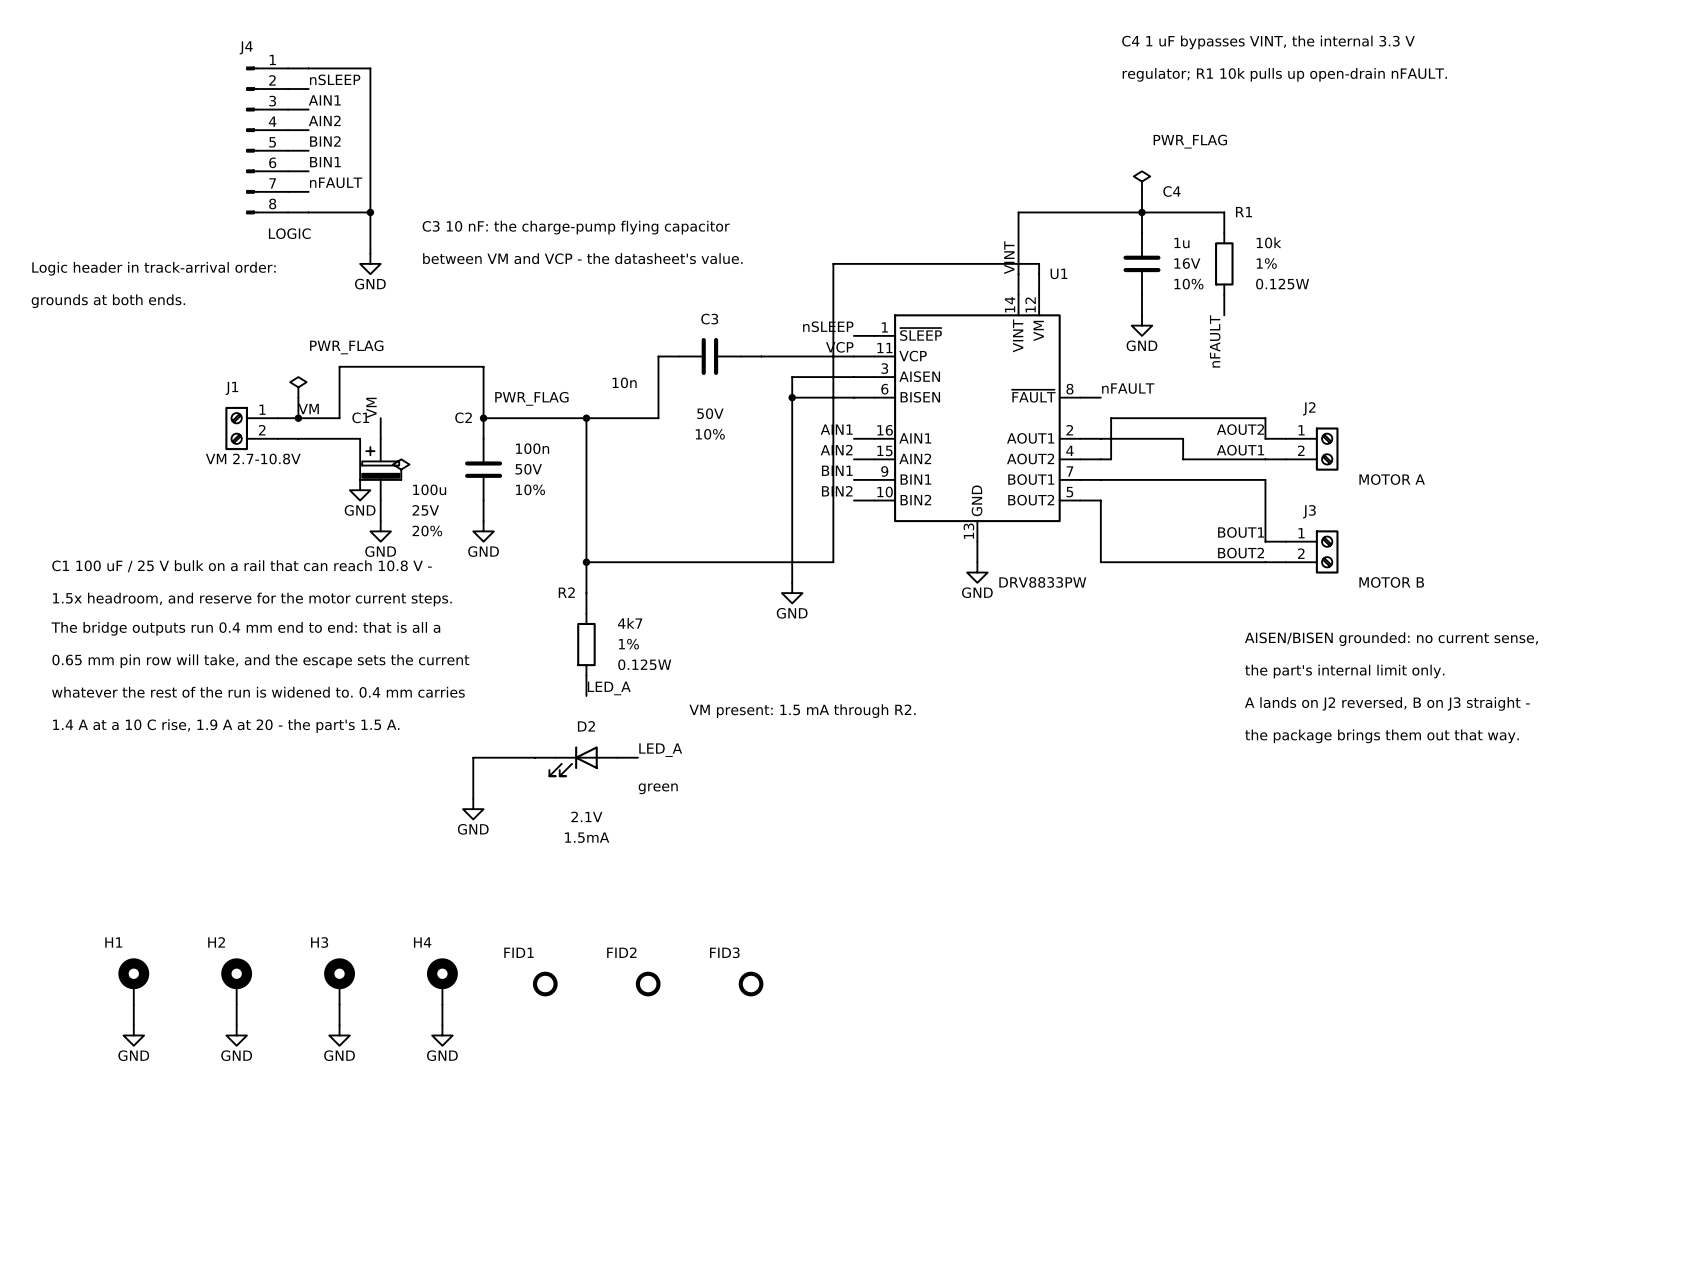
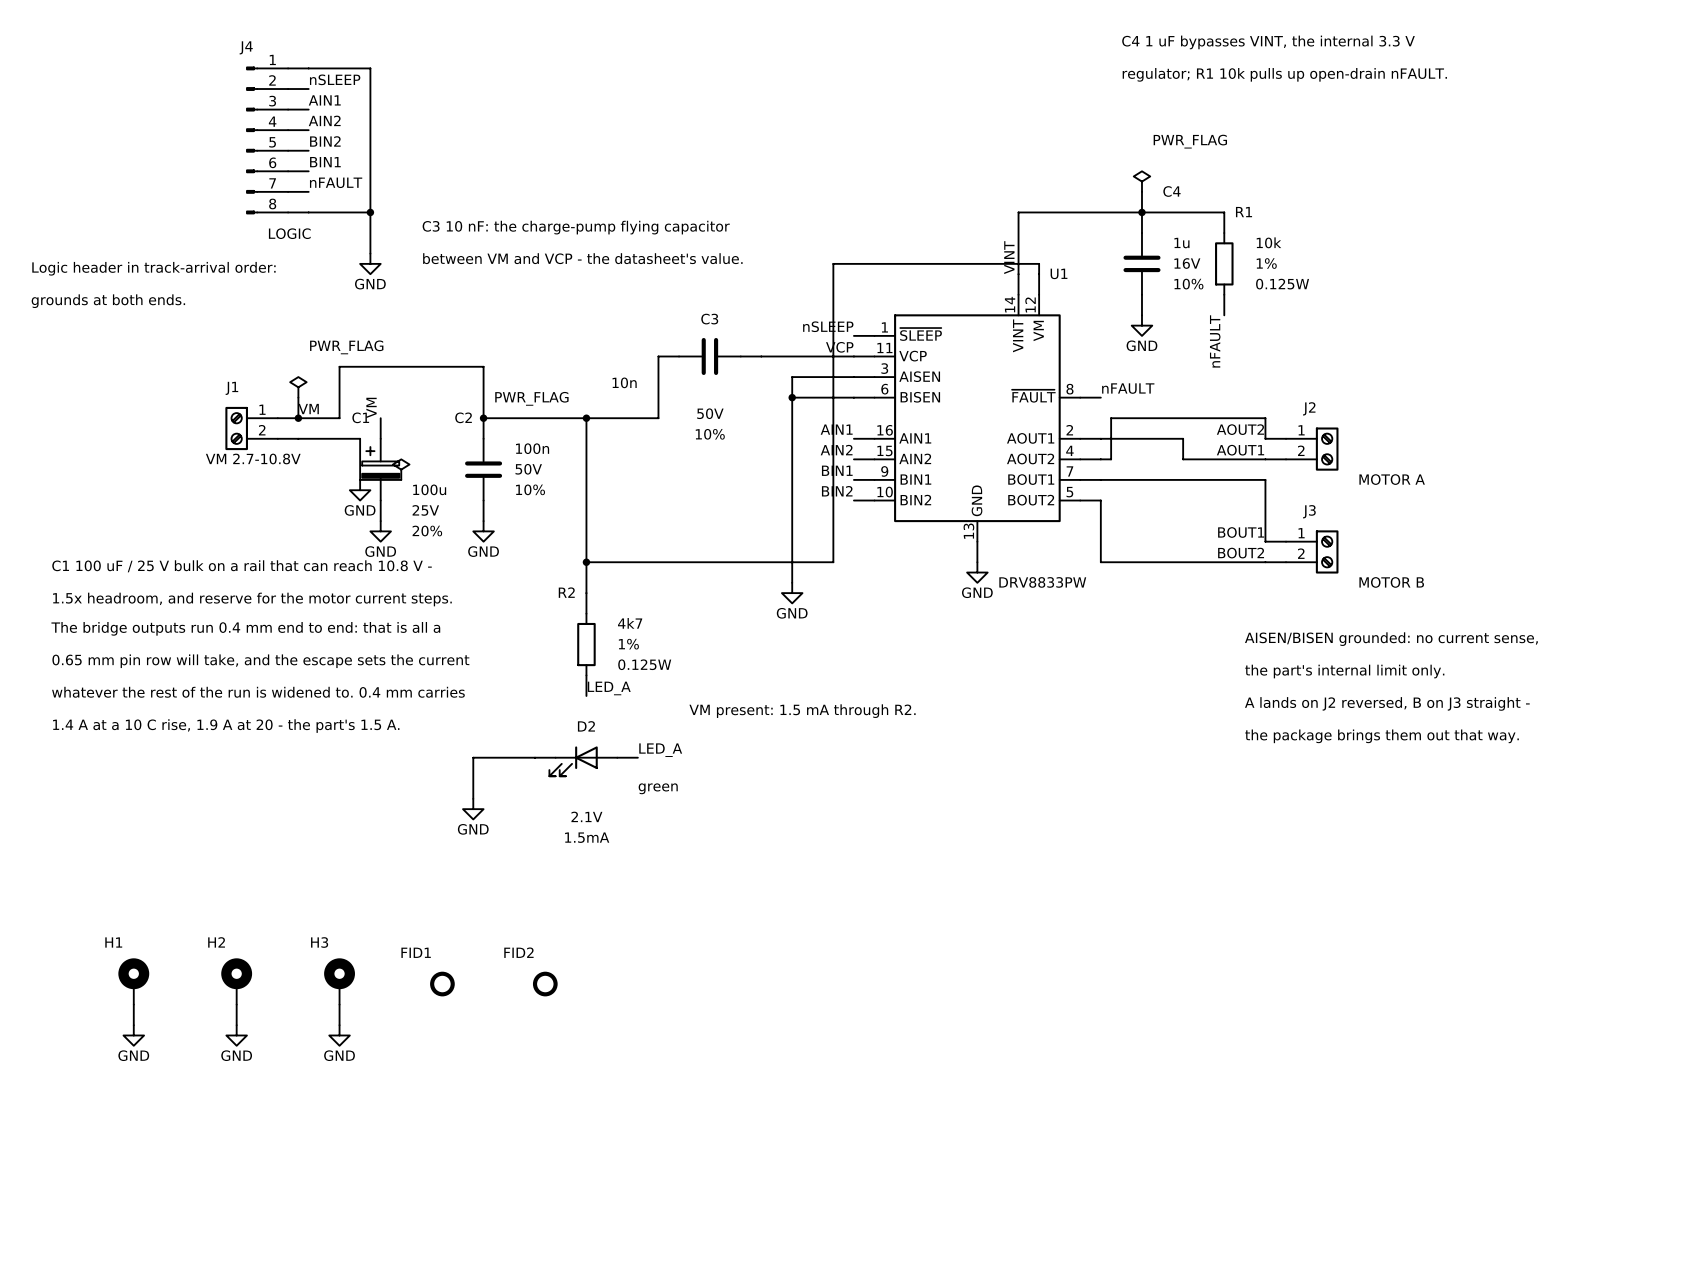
FID1 name: FID1 (518, 952) -> FID2 (518, 952)
H4: (442, 981) -> none
FID1: none -> (442, 984)
FID2: (648, 984) -> none
FID3: (751, 984) -> none
wire: (442, 1004) (442, 1025) -> none
power symbol: GND (442, 1035) -> none

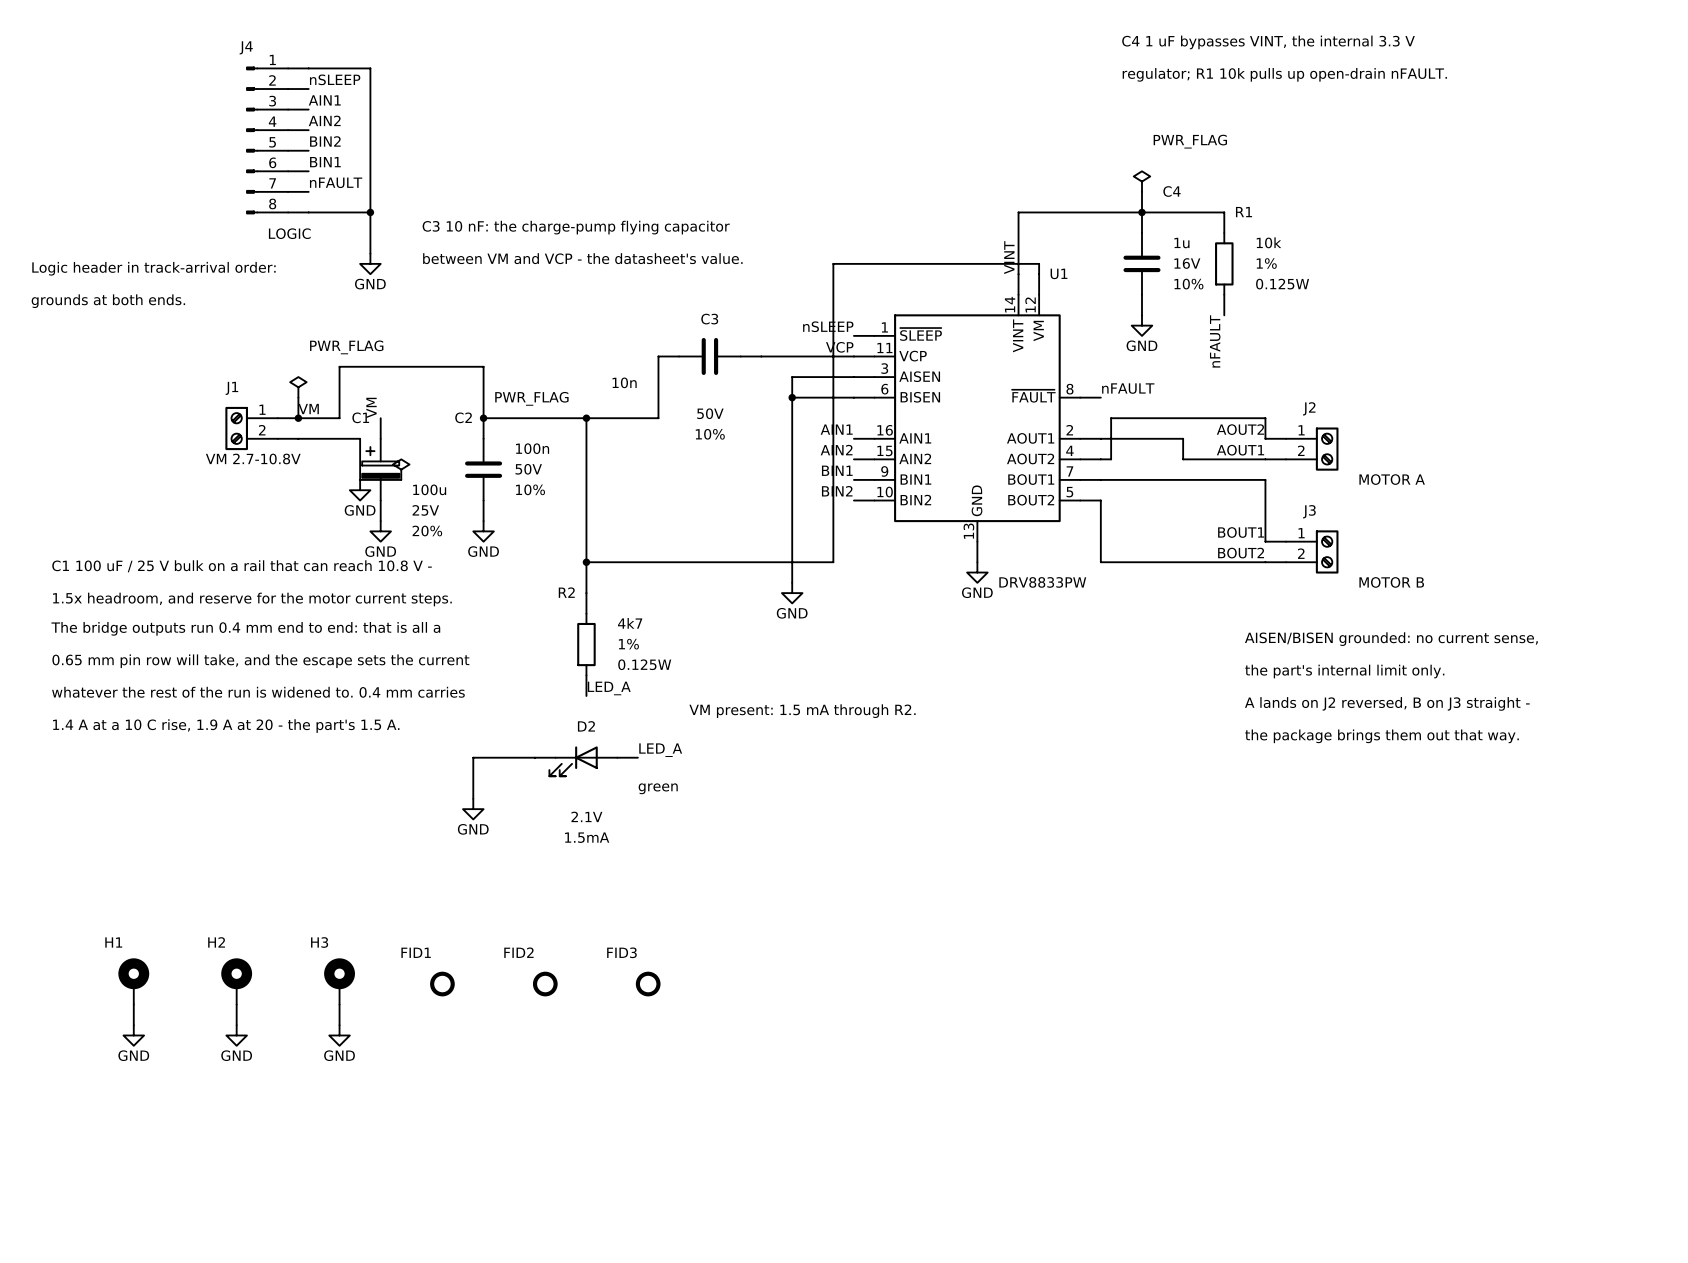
FID3: none -> (648, 984)

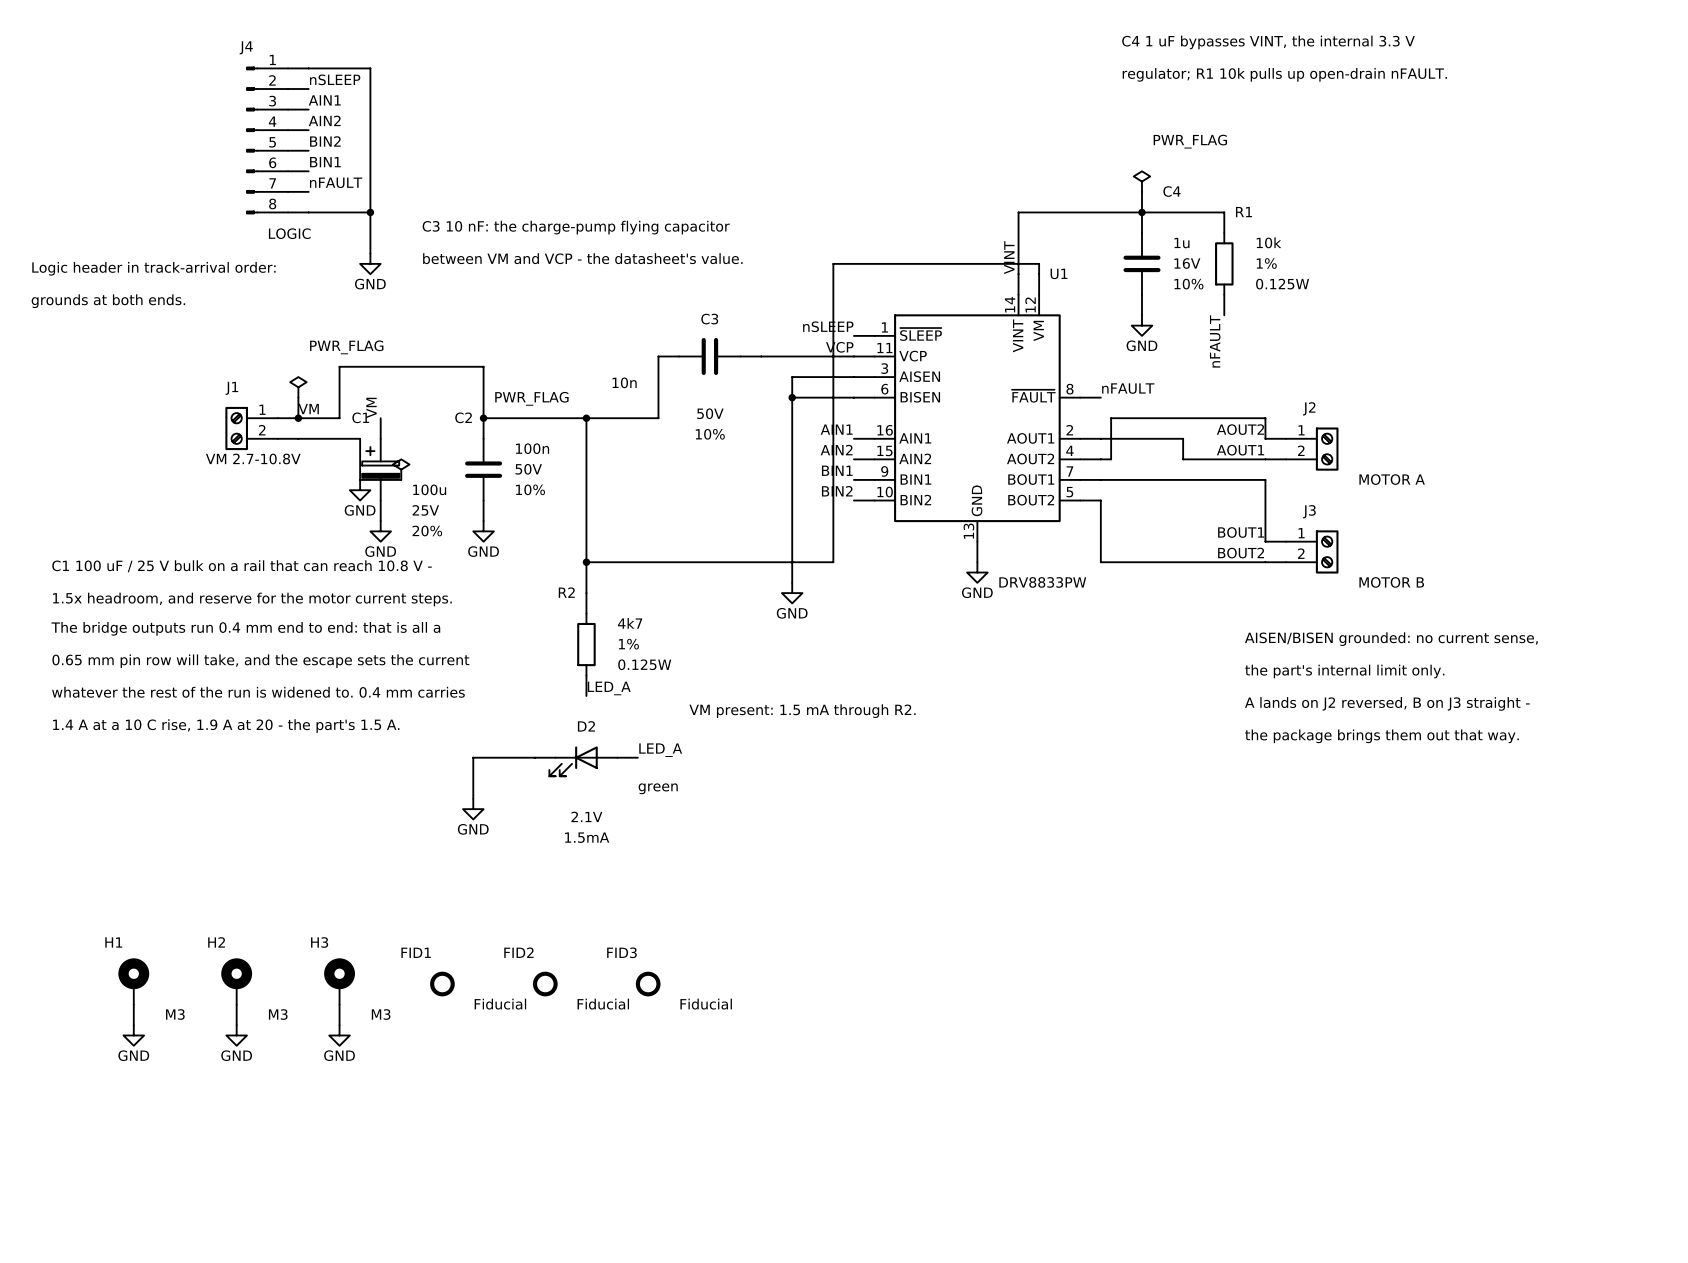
FID1 value: none -> Fiducial (500, 1004)
FID2 value: none -> Fiducial (603, 1004)
FID3 value: none -> Fiducial (706, 1004)
H1 value: none -> M3 (175, 1014)
H2 value: none -> M3 (278, 1014)
H3 value: none -> M3 (381, 1014)

